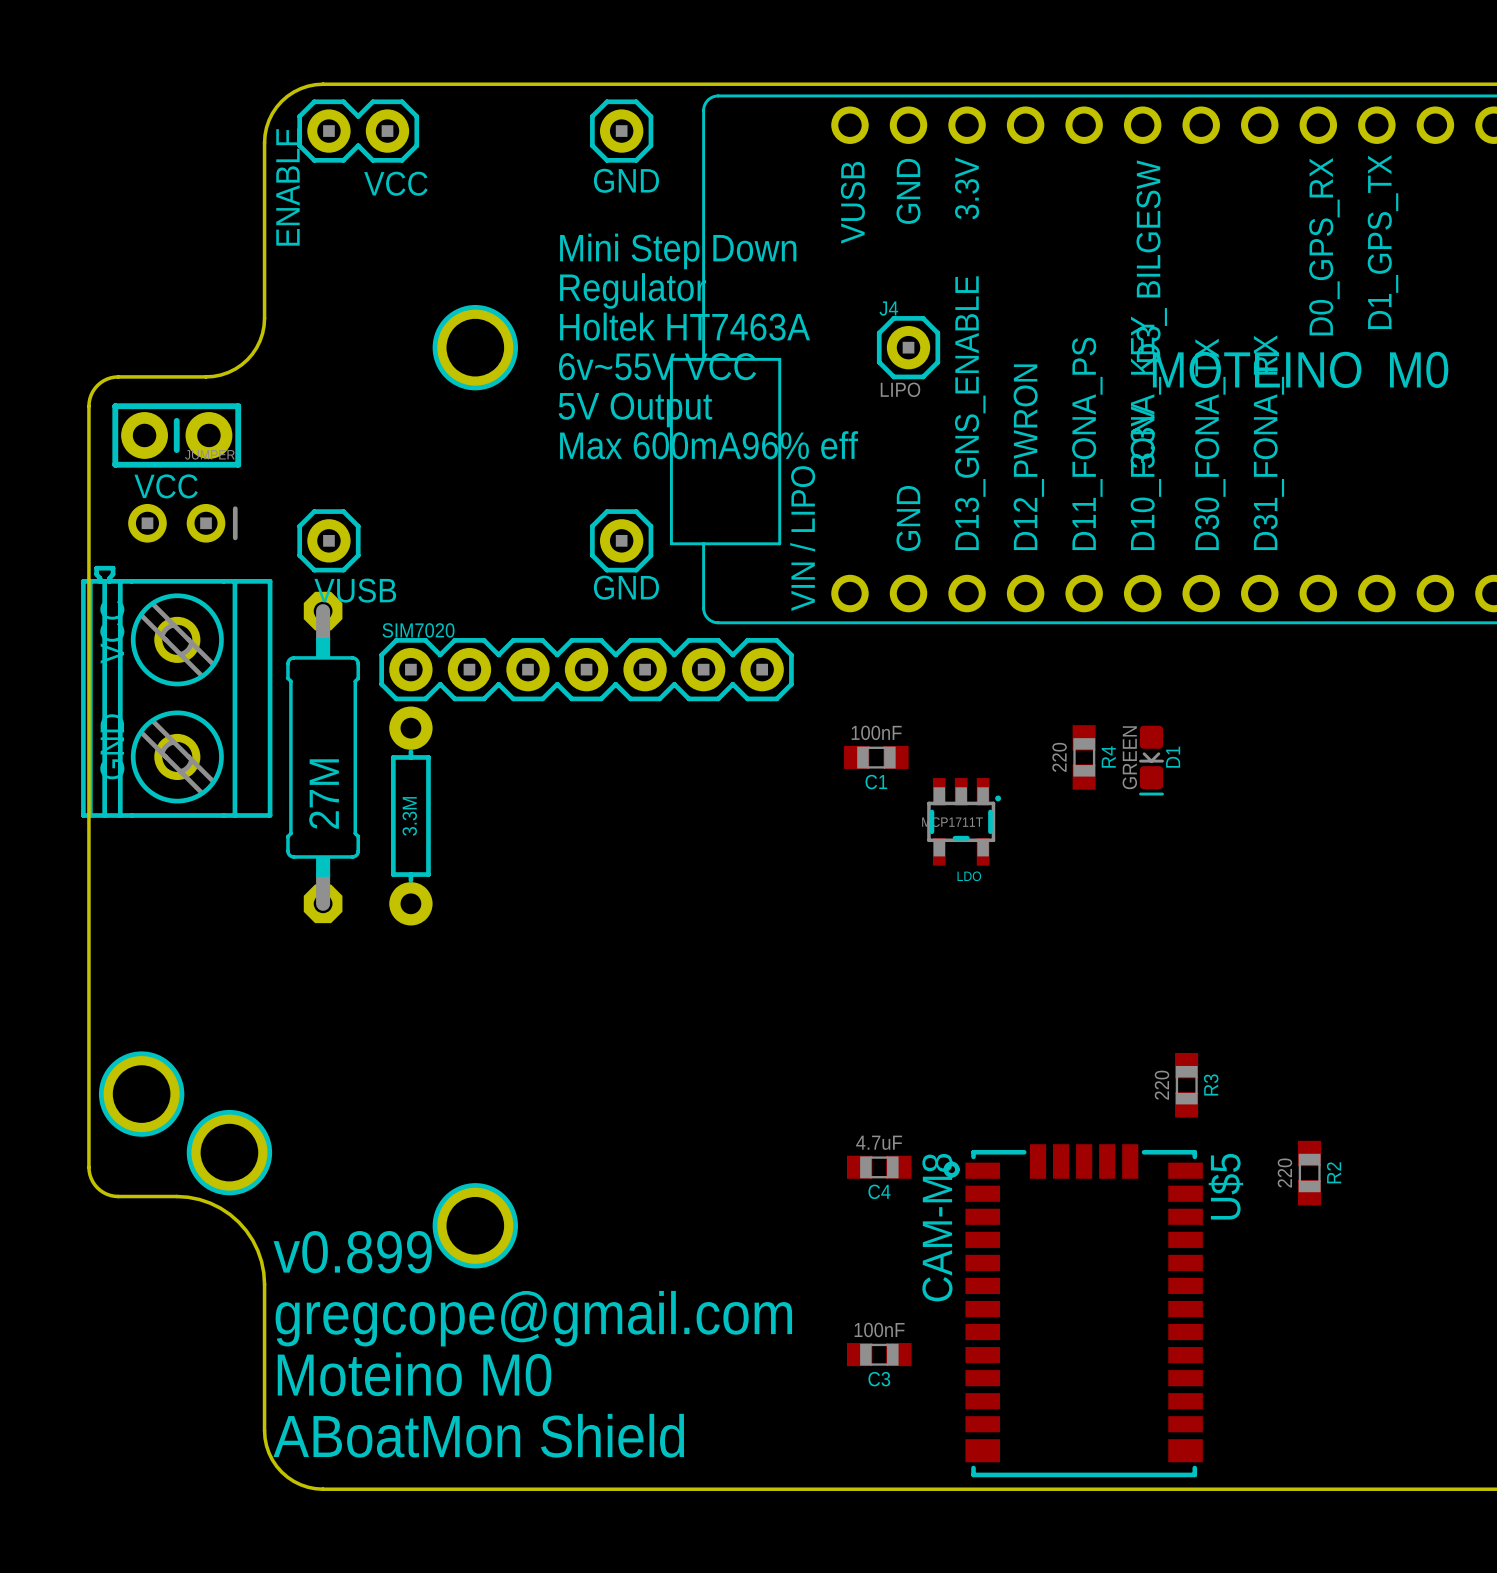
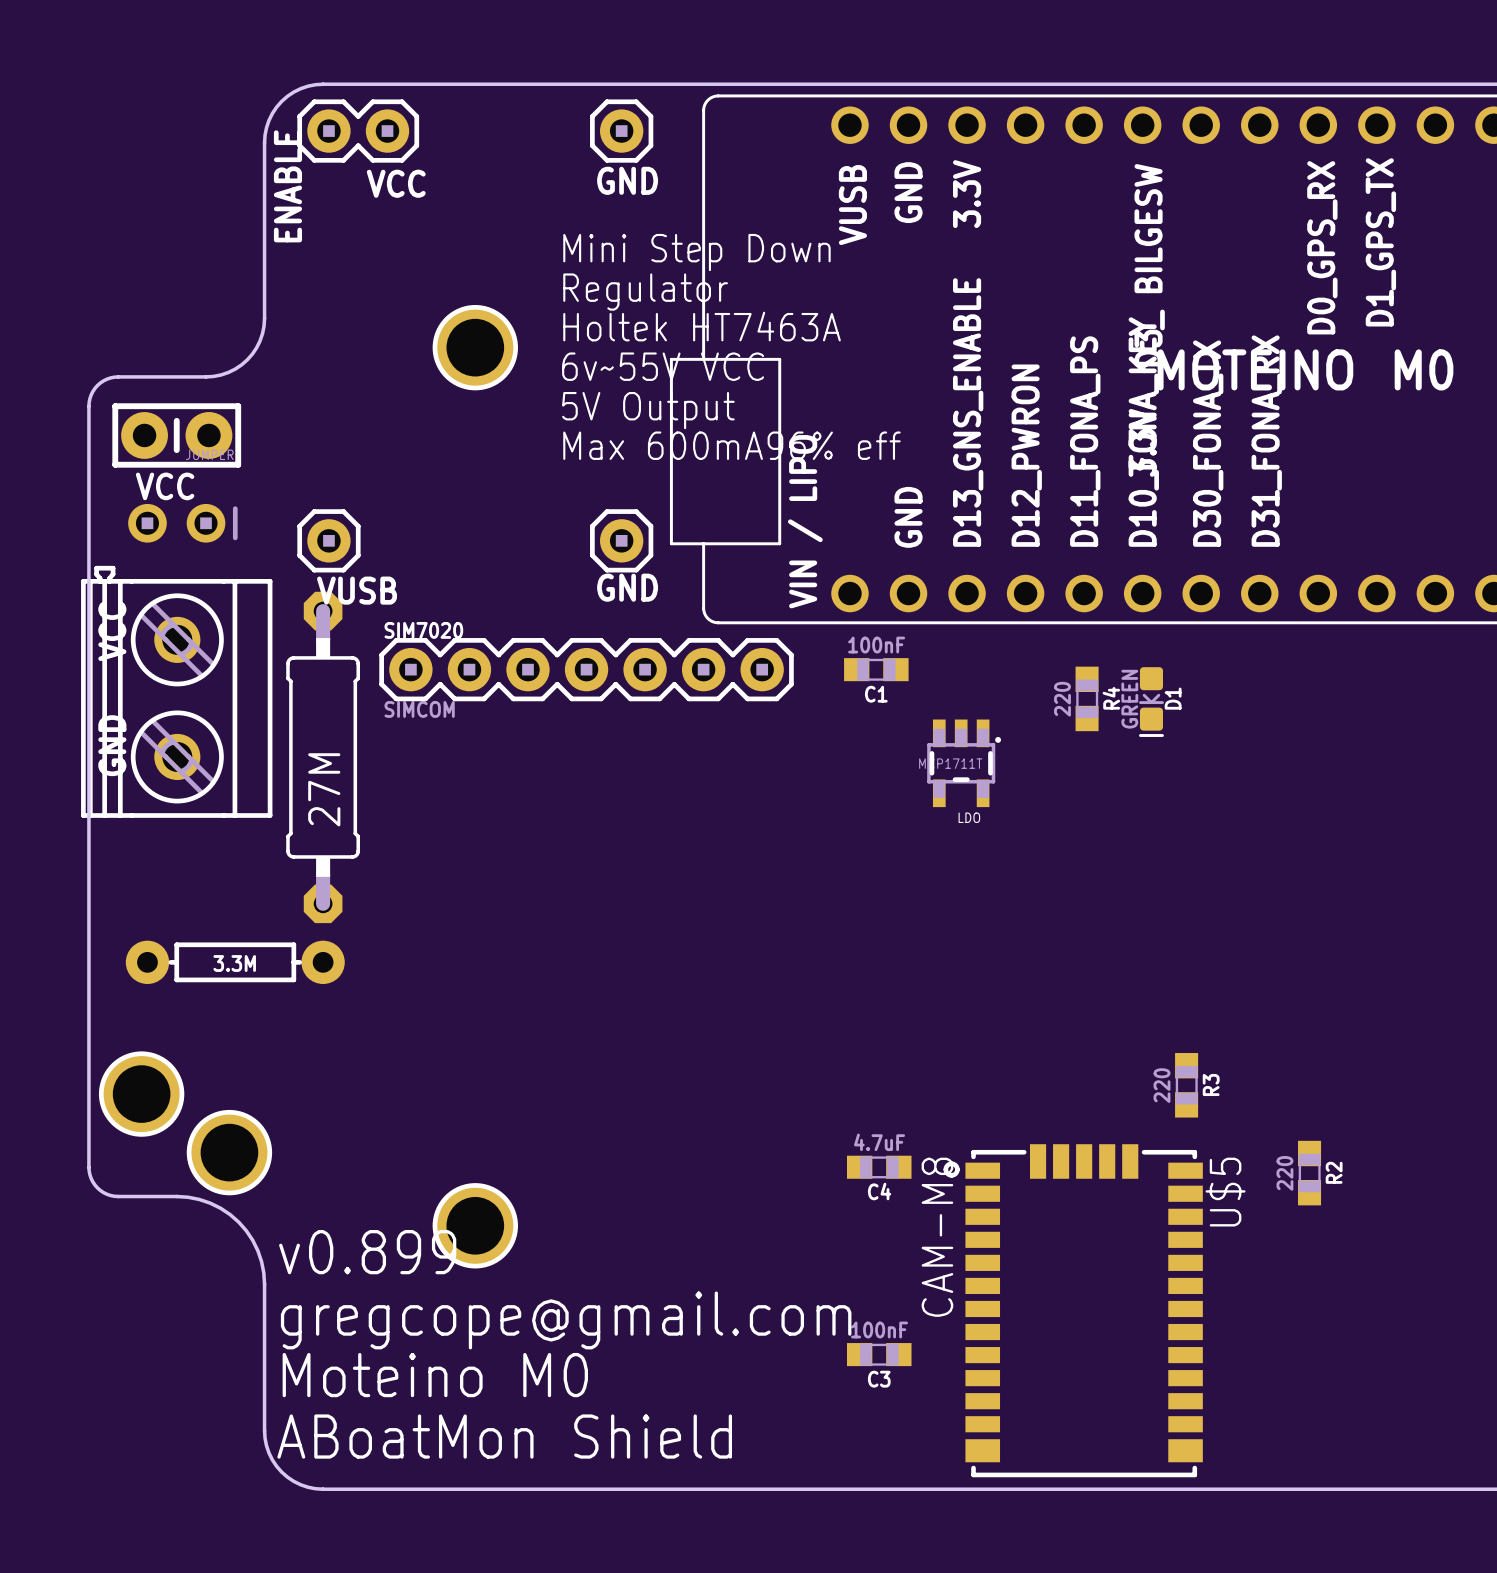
J4: LIPO (908, 347) -> none
SIM7020 value: none -> SIMCOM (419, 709)
C1 position: (876, 757) -> (876, 669)
R4 position: (1084, 757) -> (1087, 698)
D1 position: (1151, 760) -> (1151, 702)
part rotation: 0° (410, 815) -> 90° clockwise (235, 962)
part position: (410, 815) -> (235, 962)
LDO position: (964, 821) -> (964, 763)

